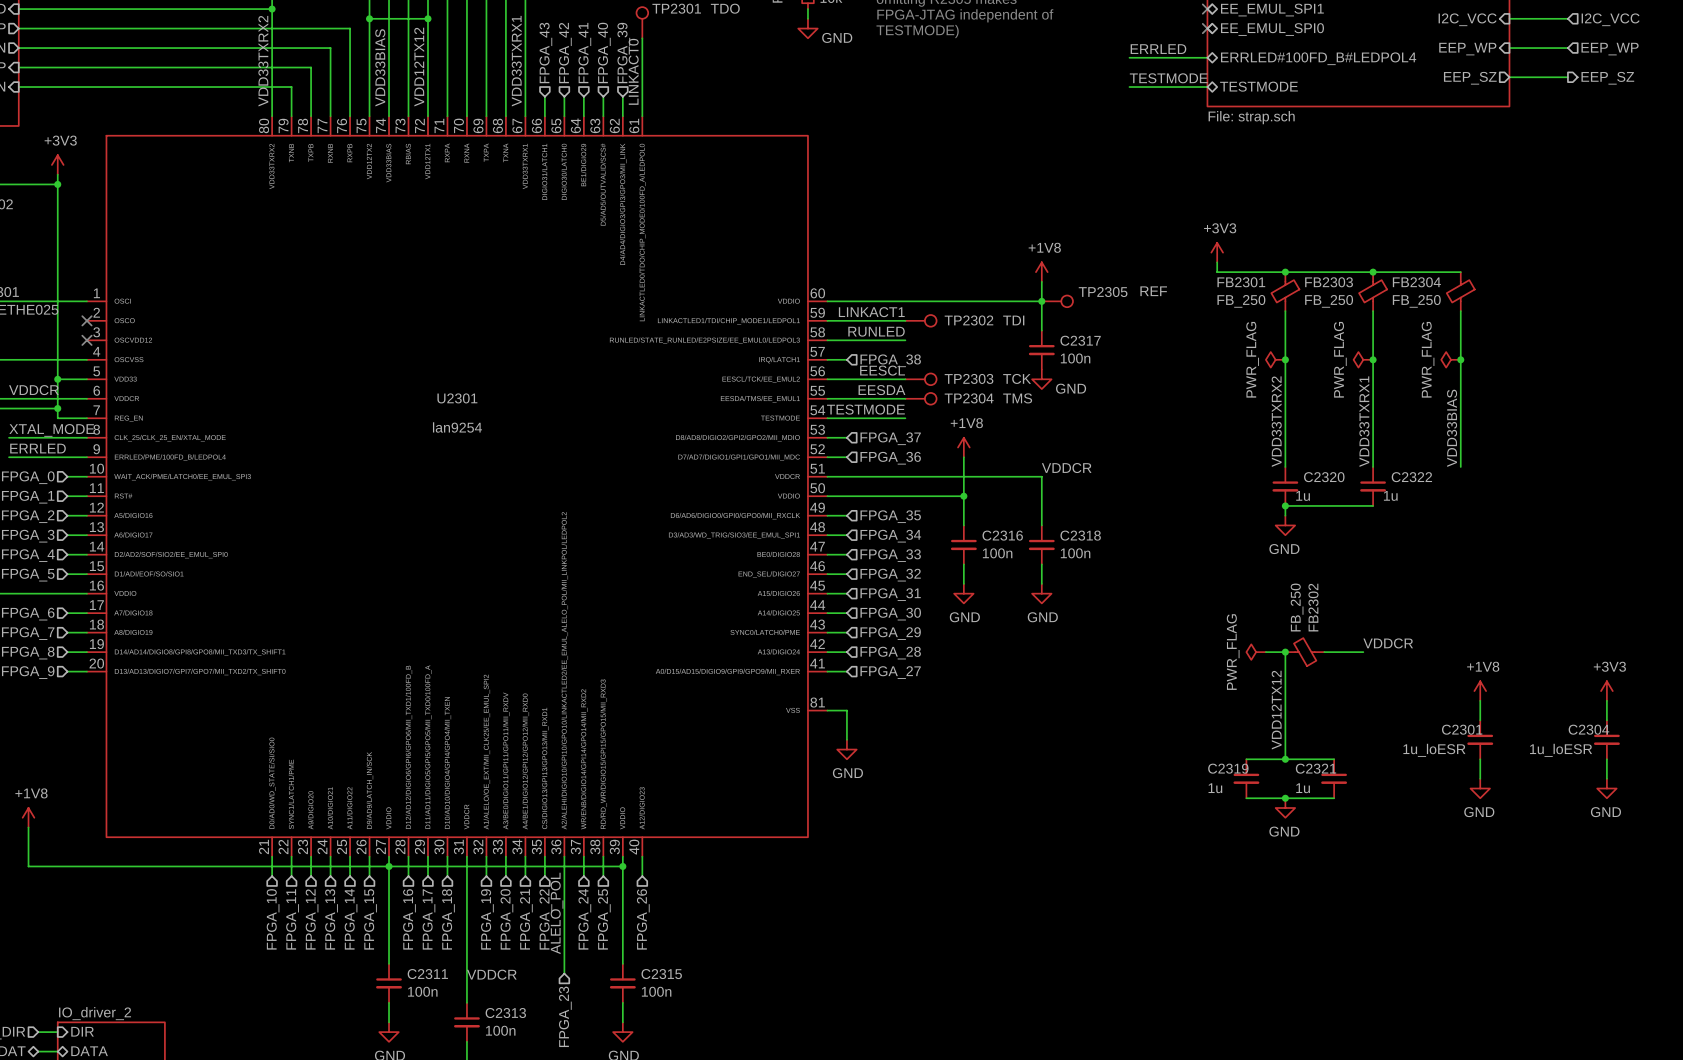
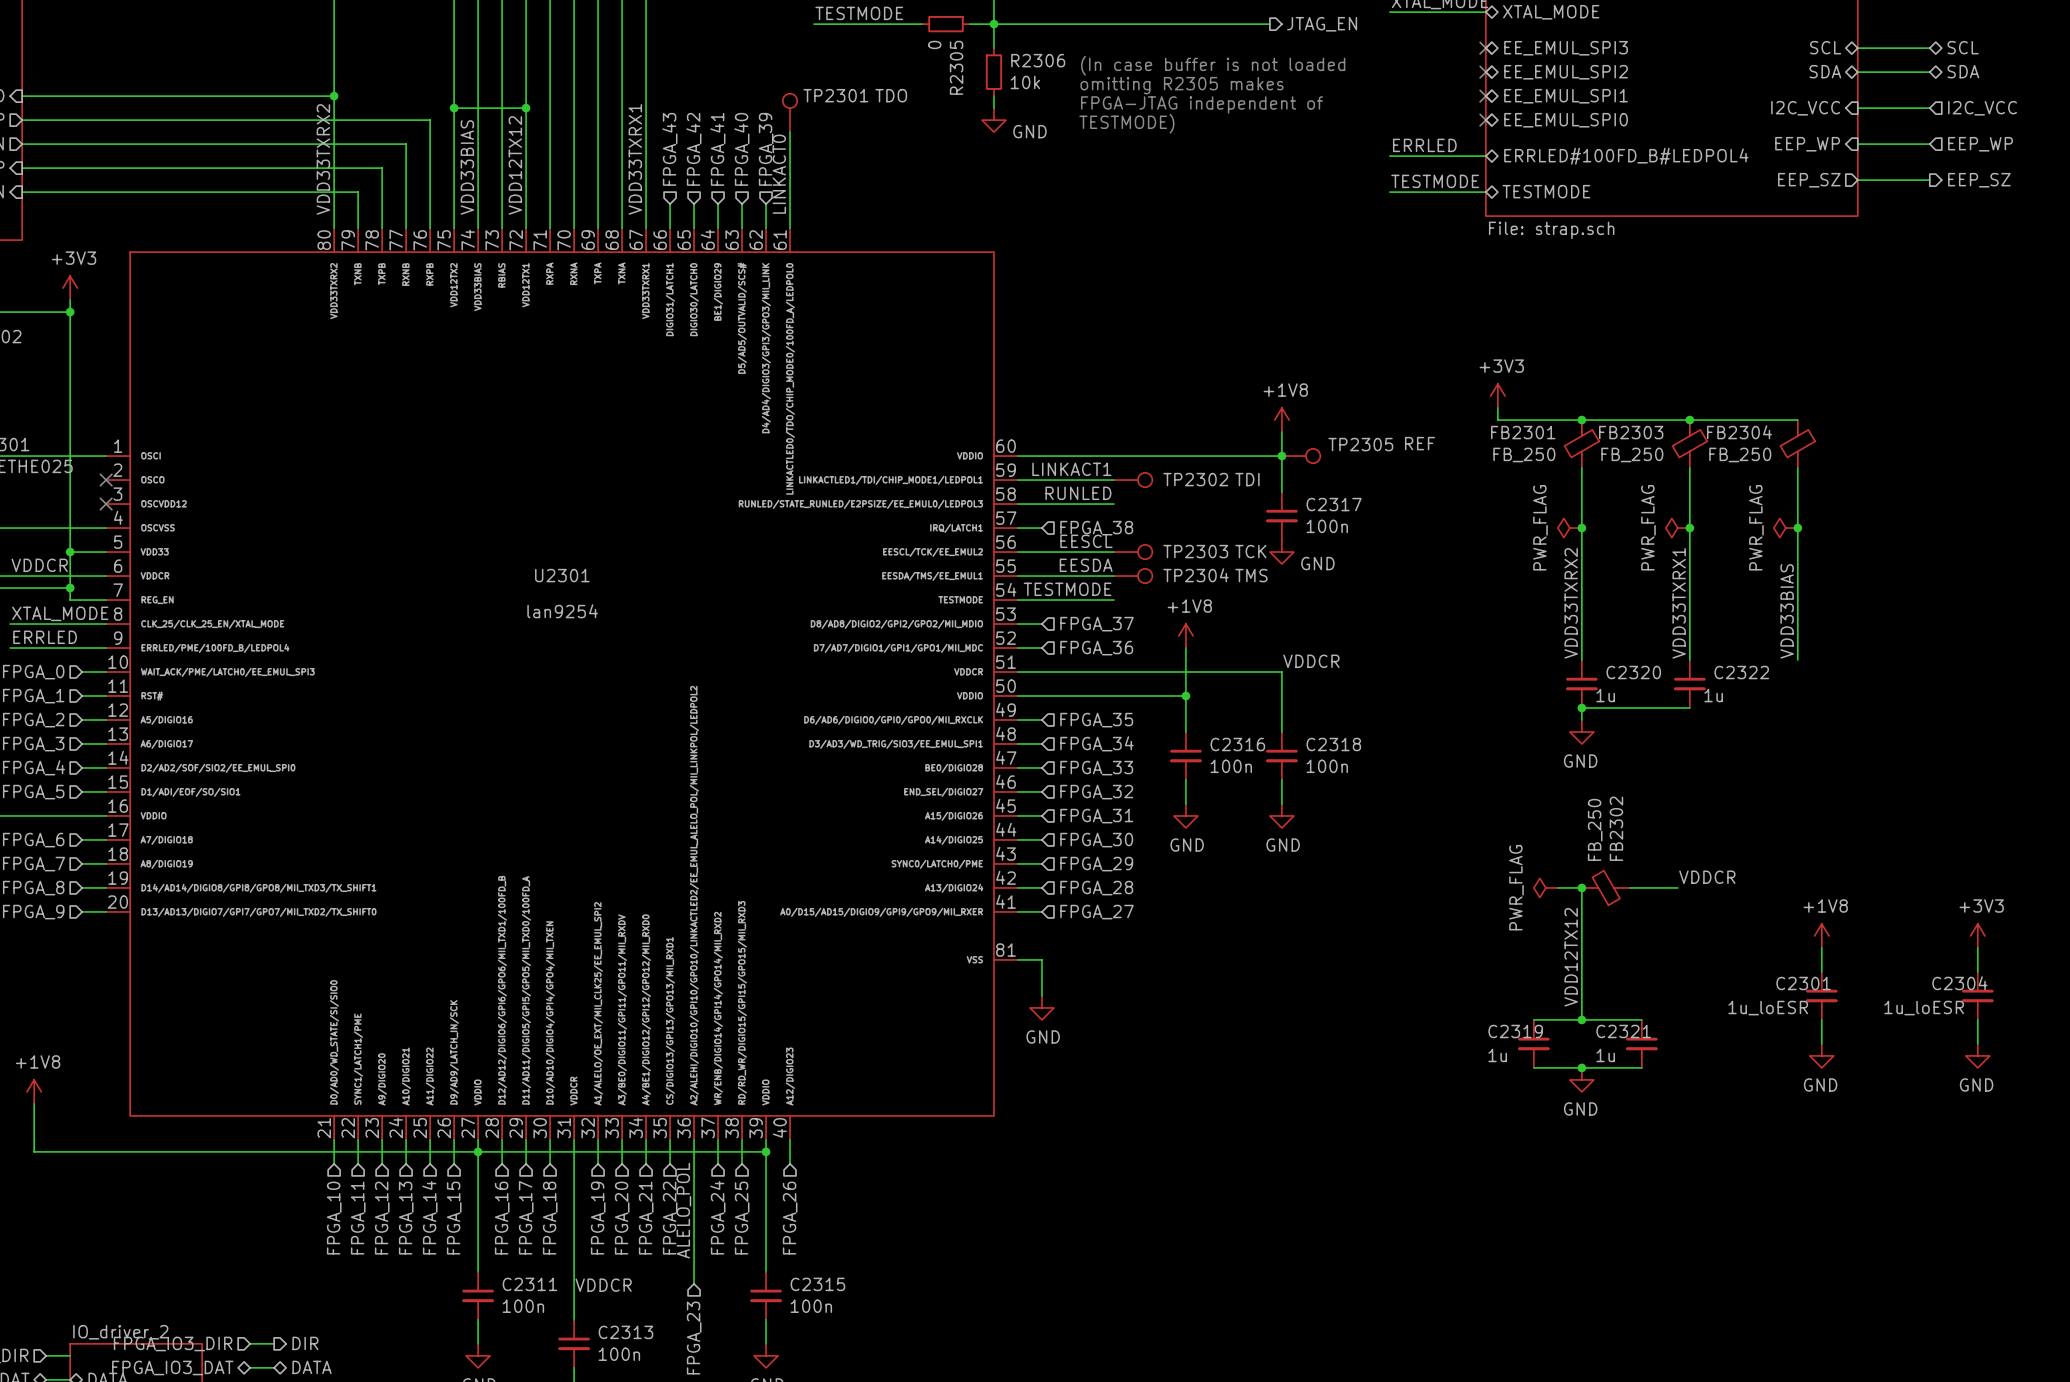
wire: none -> (250, 1343) (274, 1343)
hierarchical label: none -> FPGA_IO3_DIR (173, 1343)
sheet pin position: DIR (82, 1031) -> DIR (305, 1343)
wire: none -> (250, 1367) (274, 1367)
sheet pin: none -> DATA (312, 1367)
hierarchical label: none -> FPGA_IO3_DAT (172, 1367)

